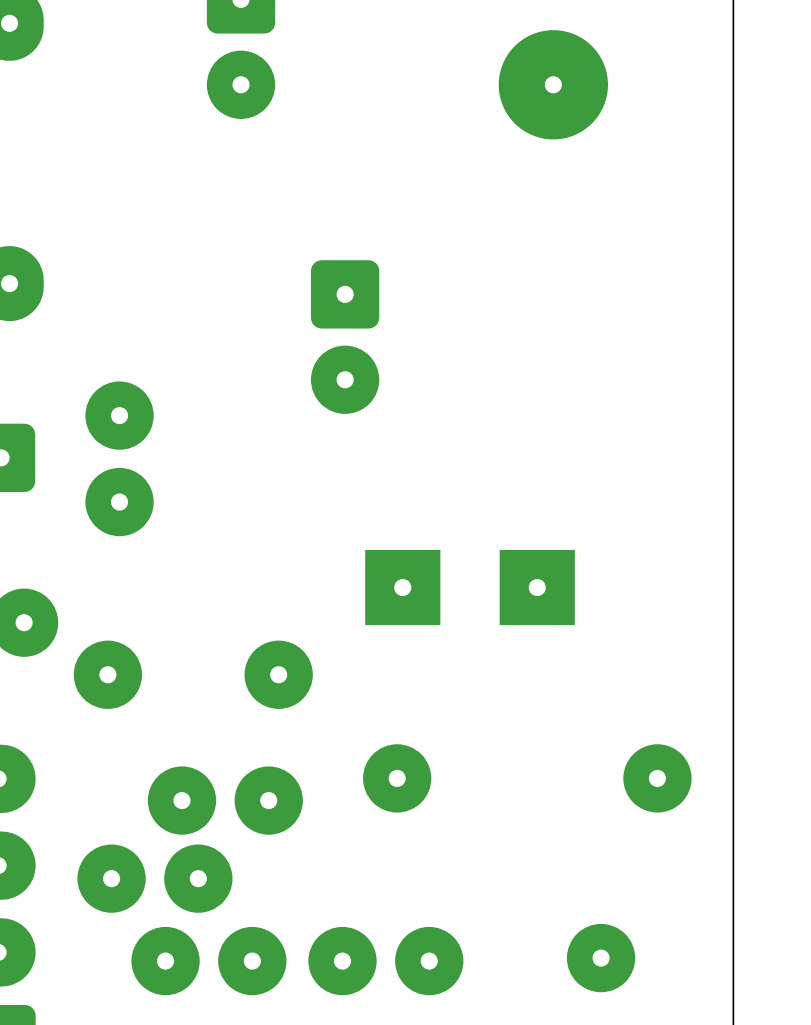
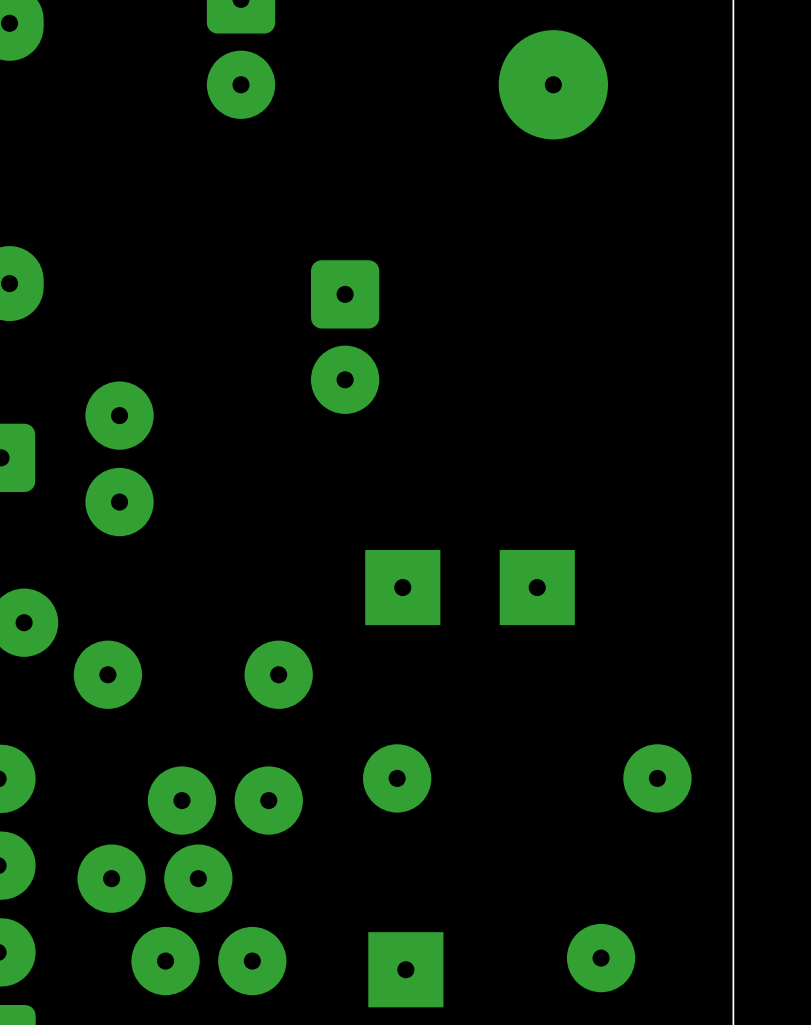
part footprint: [308, 926, 464, 996] -> [368, 932, 444, 1008]

